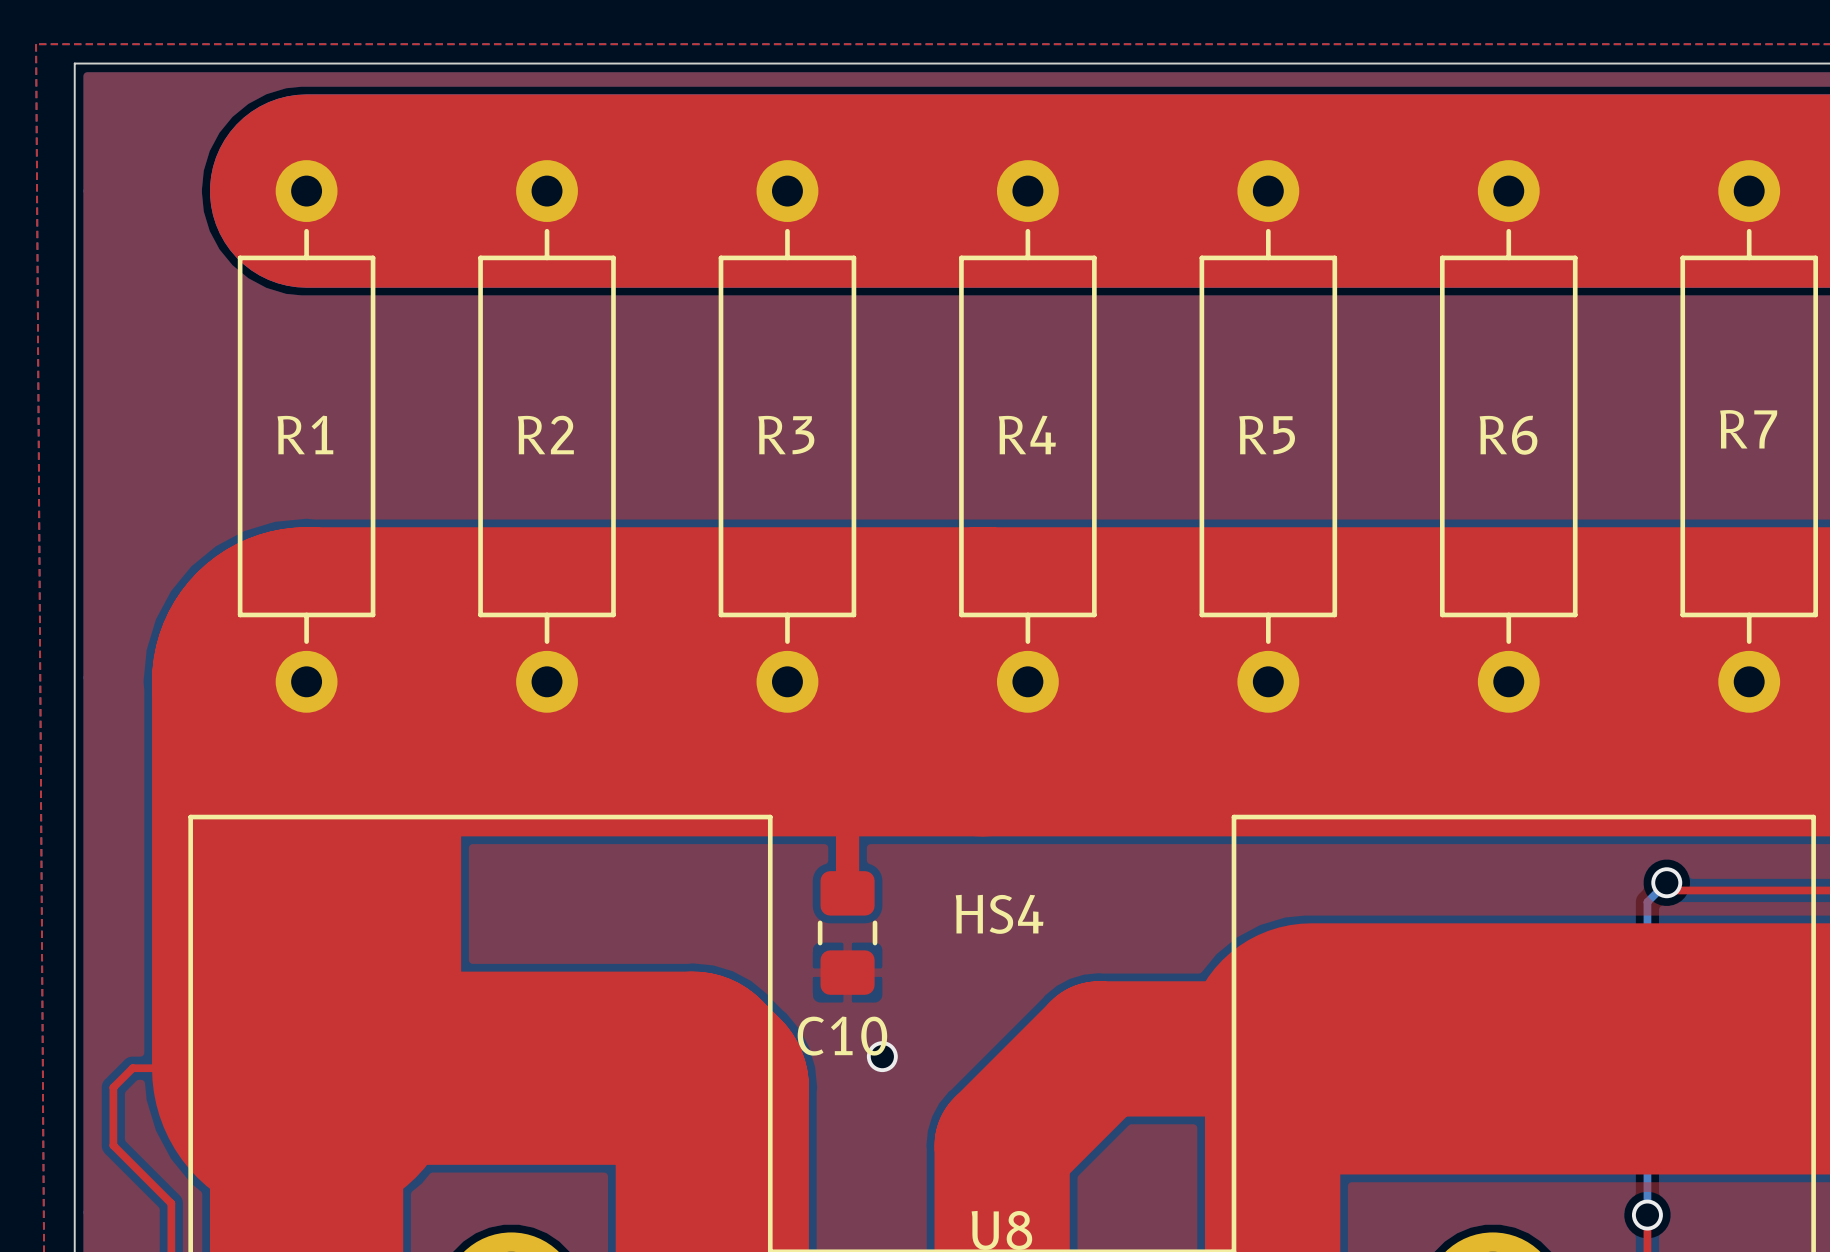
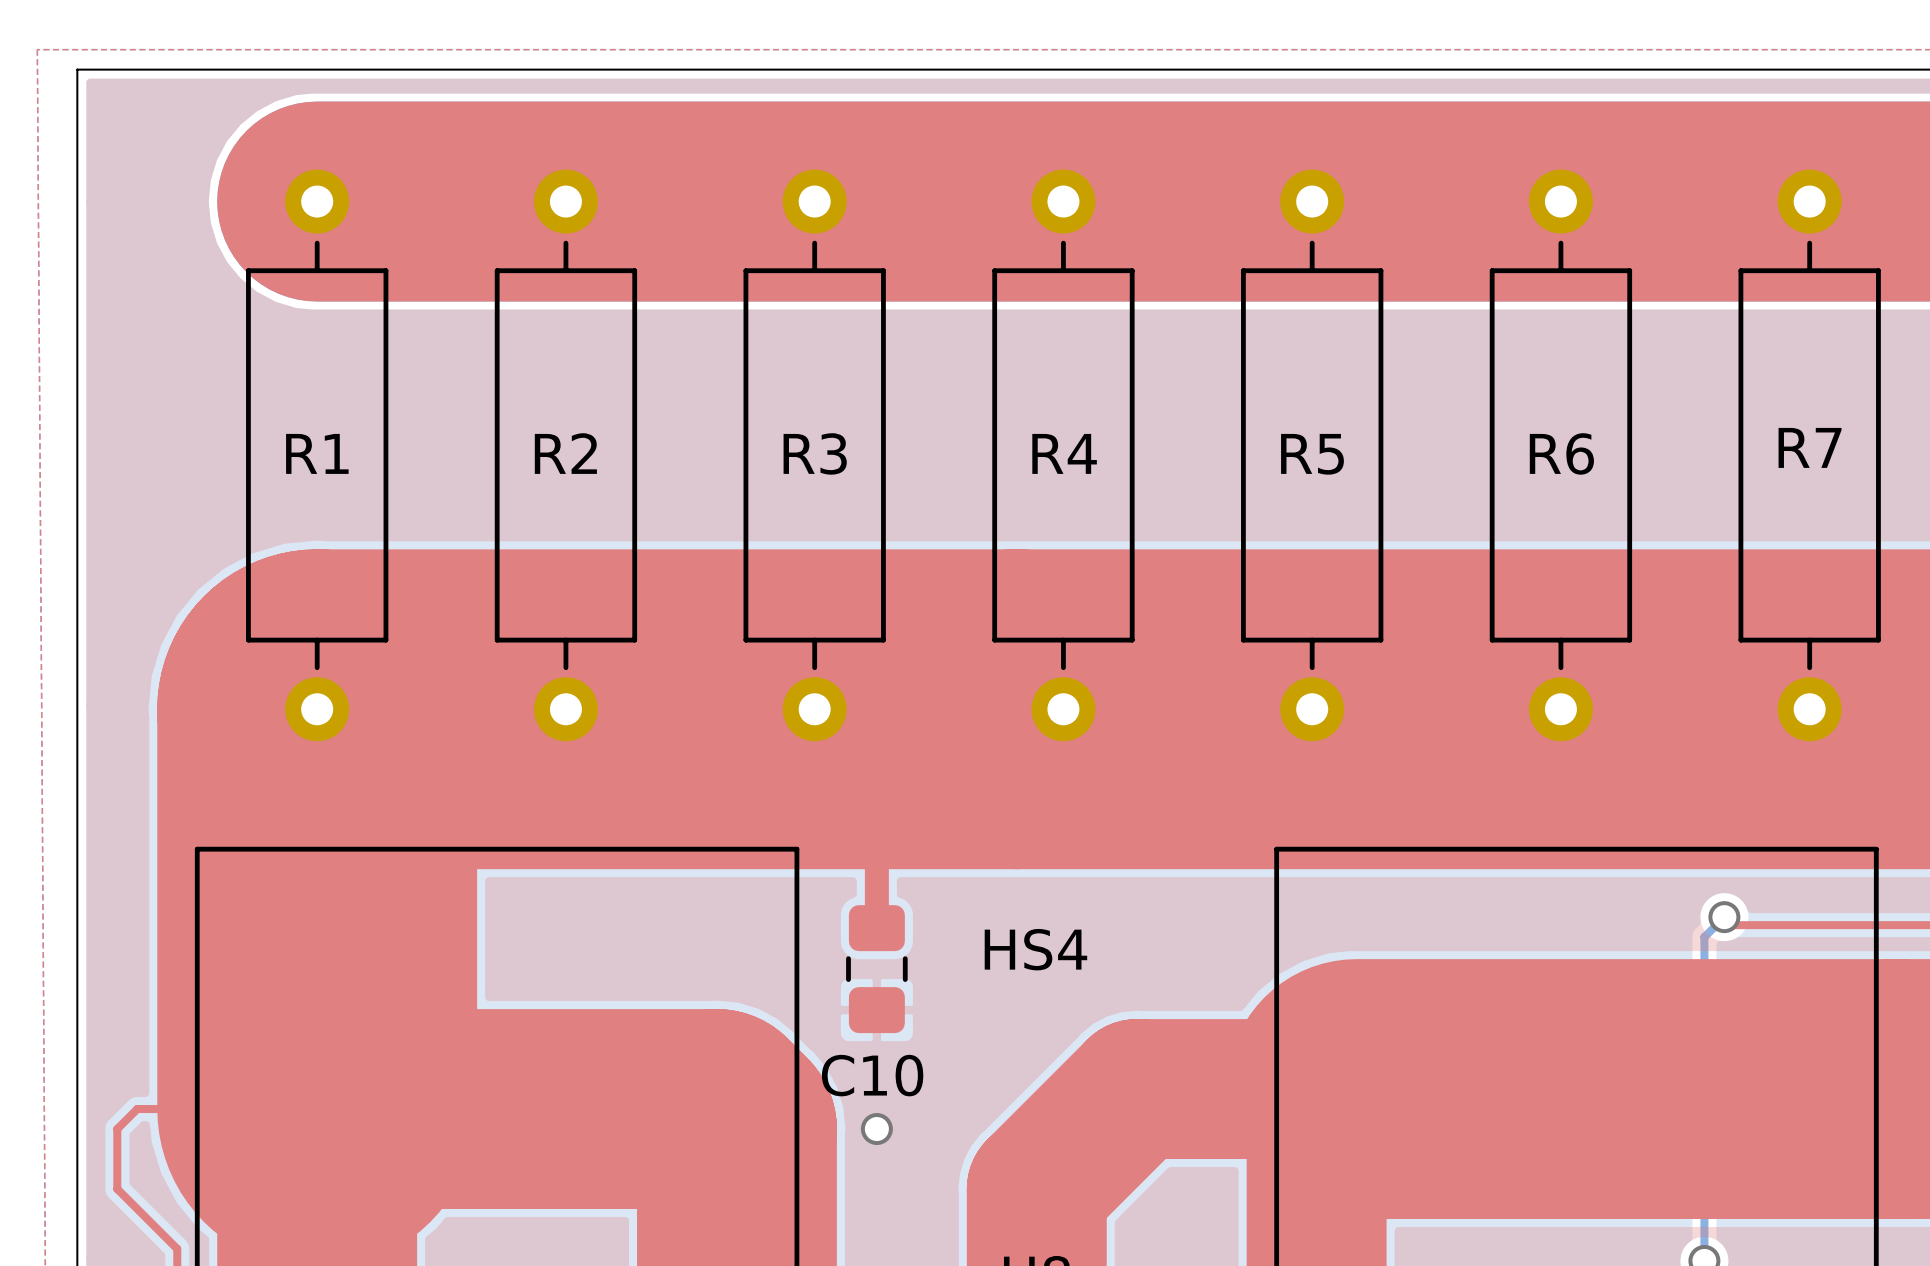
via position: (882, 1056) -> (876, 1129)

